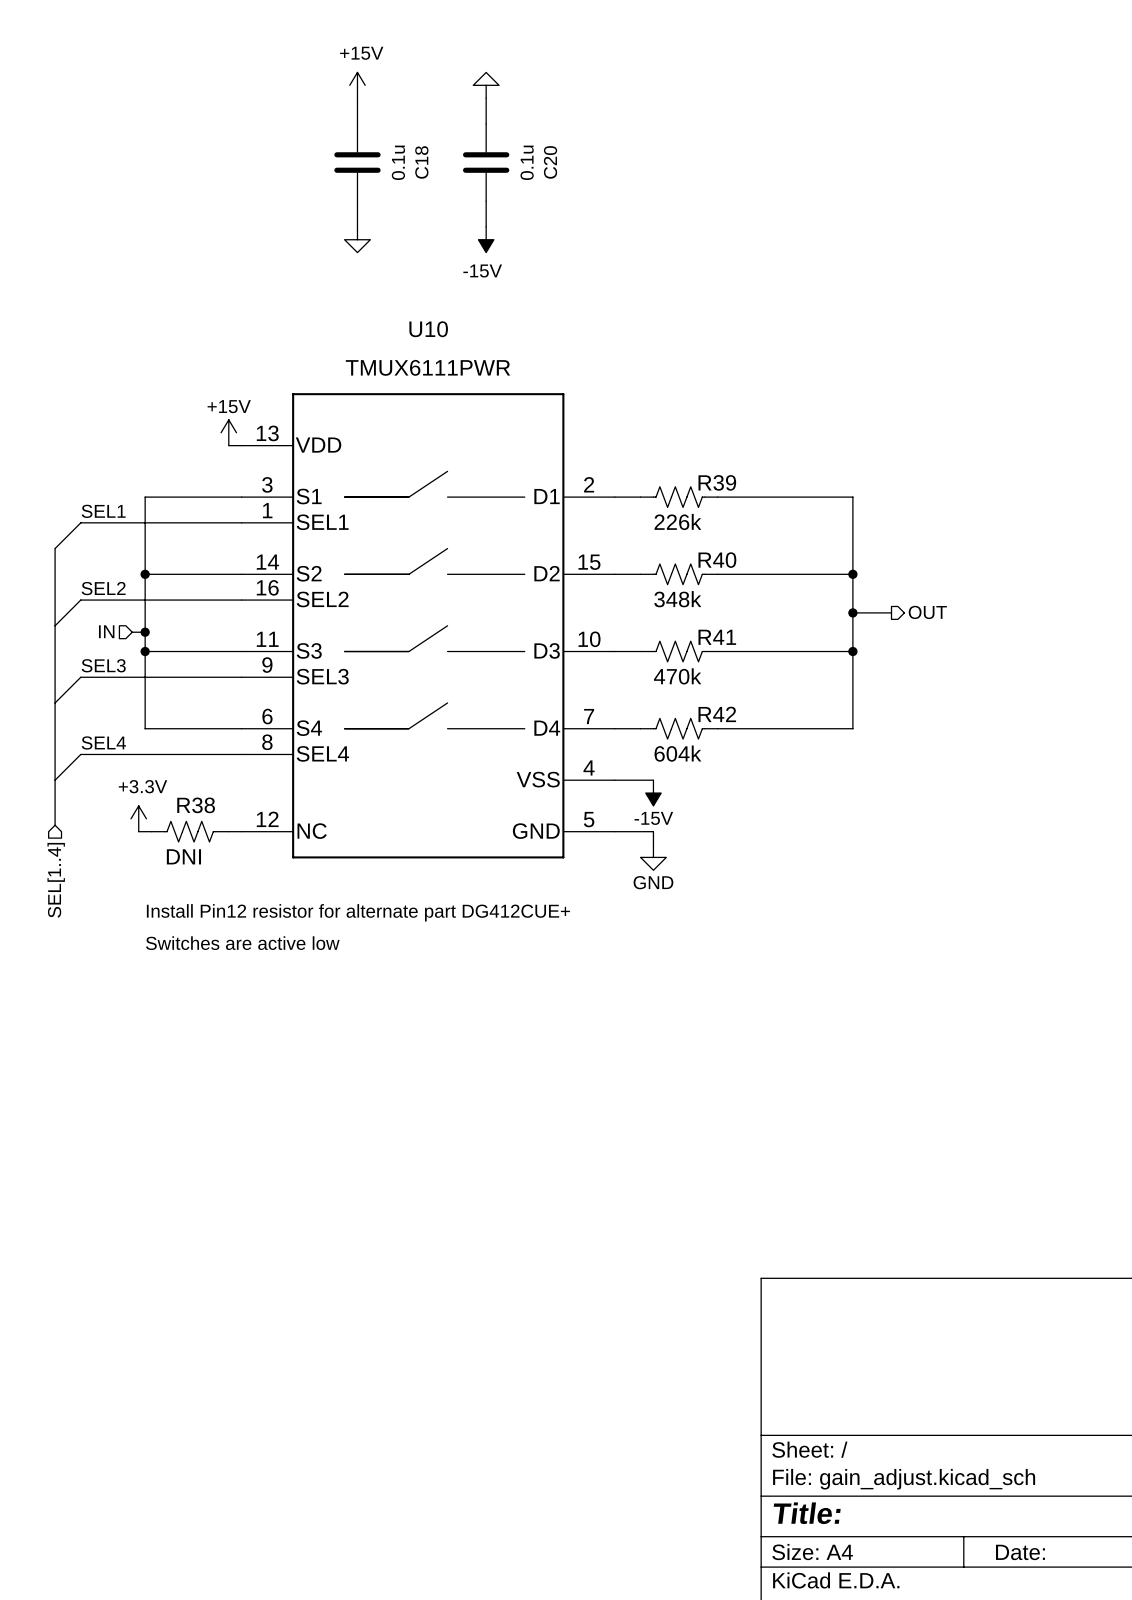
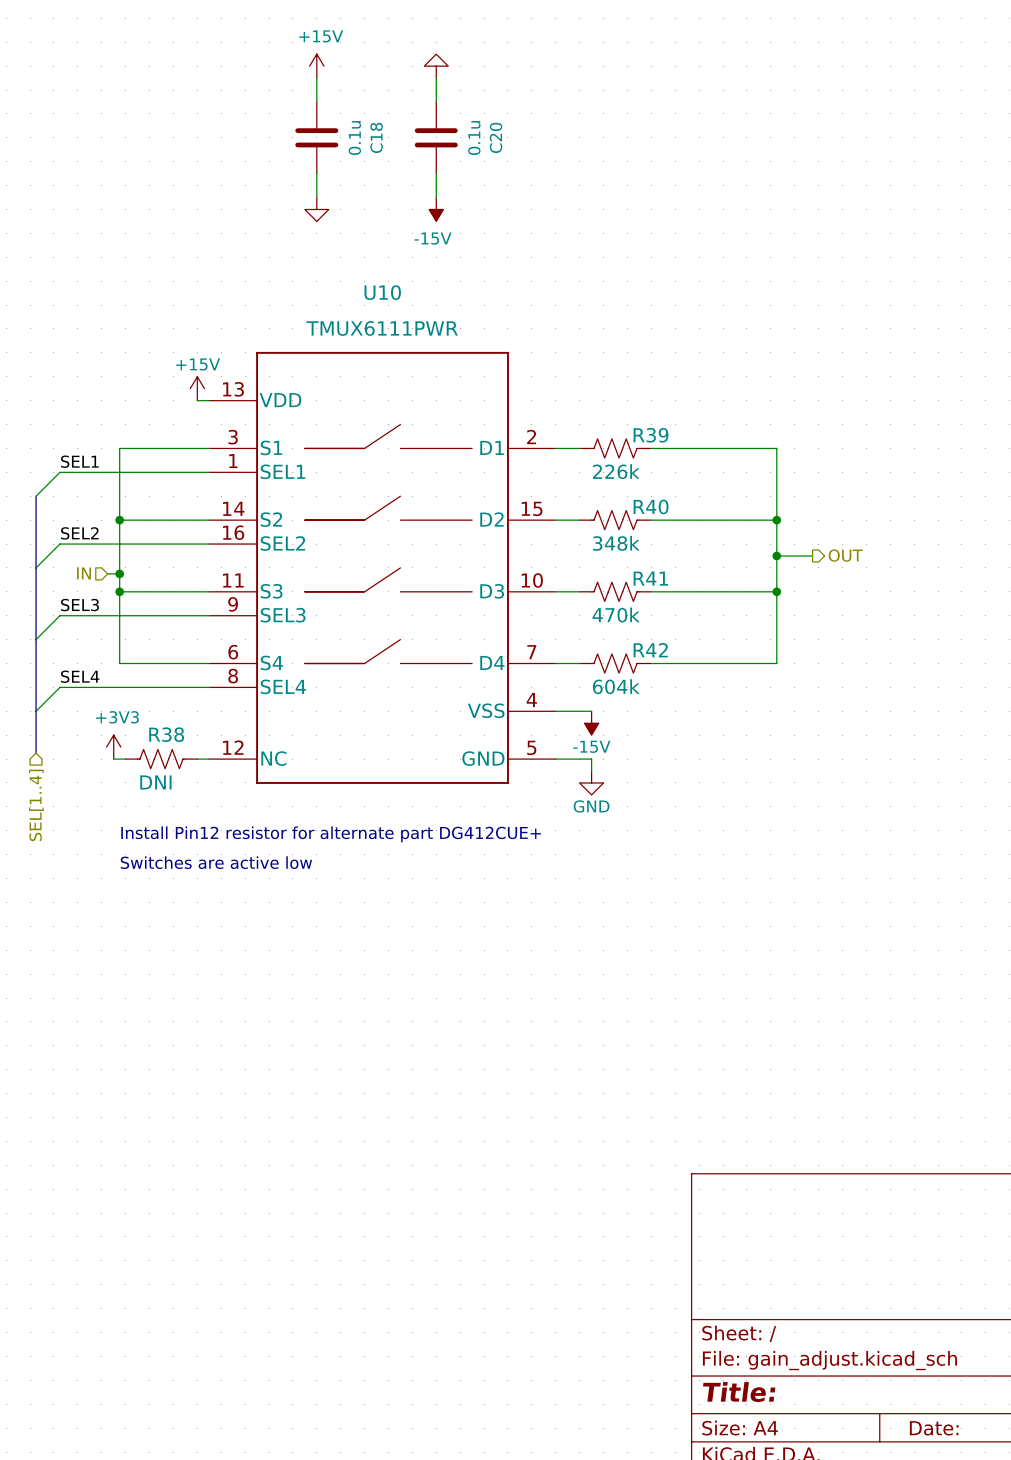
power symbol: +3.3V (138, 818) -> +3V3 (113, 747)

